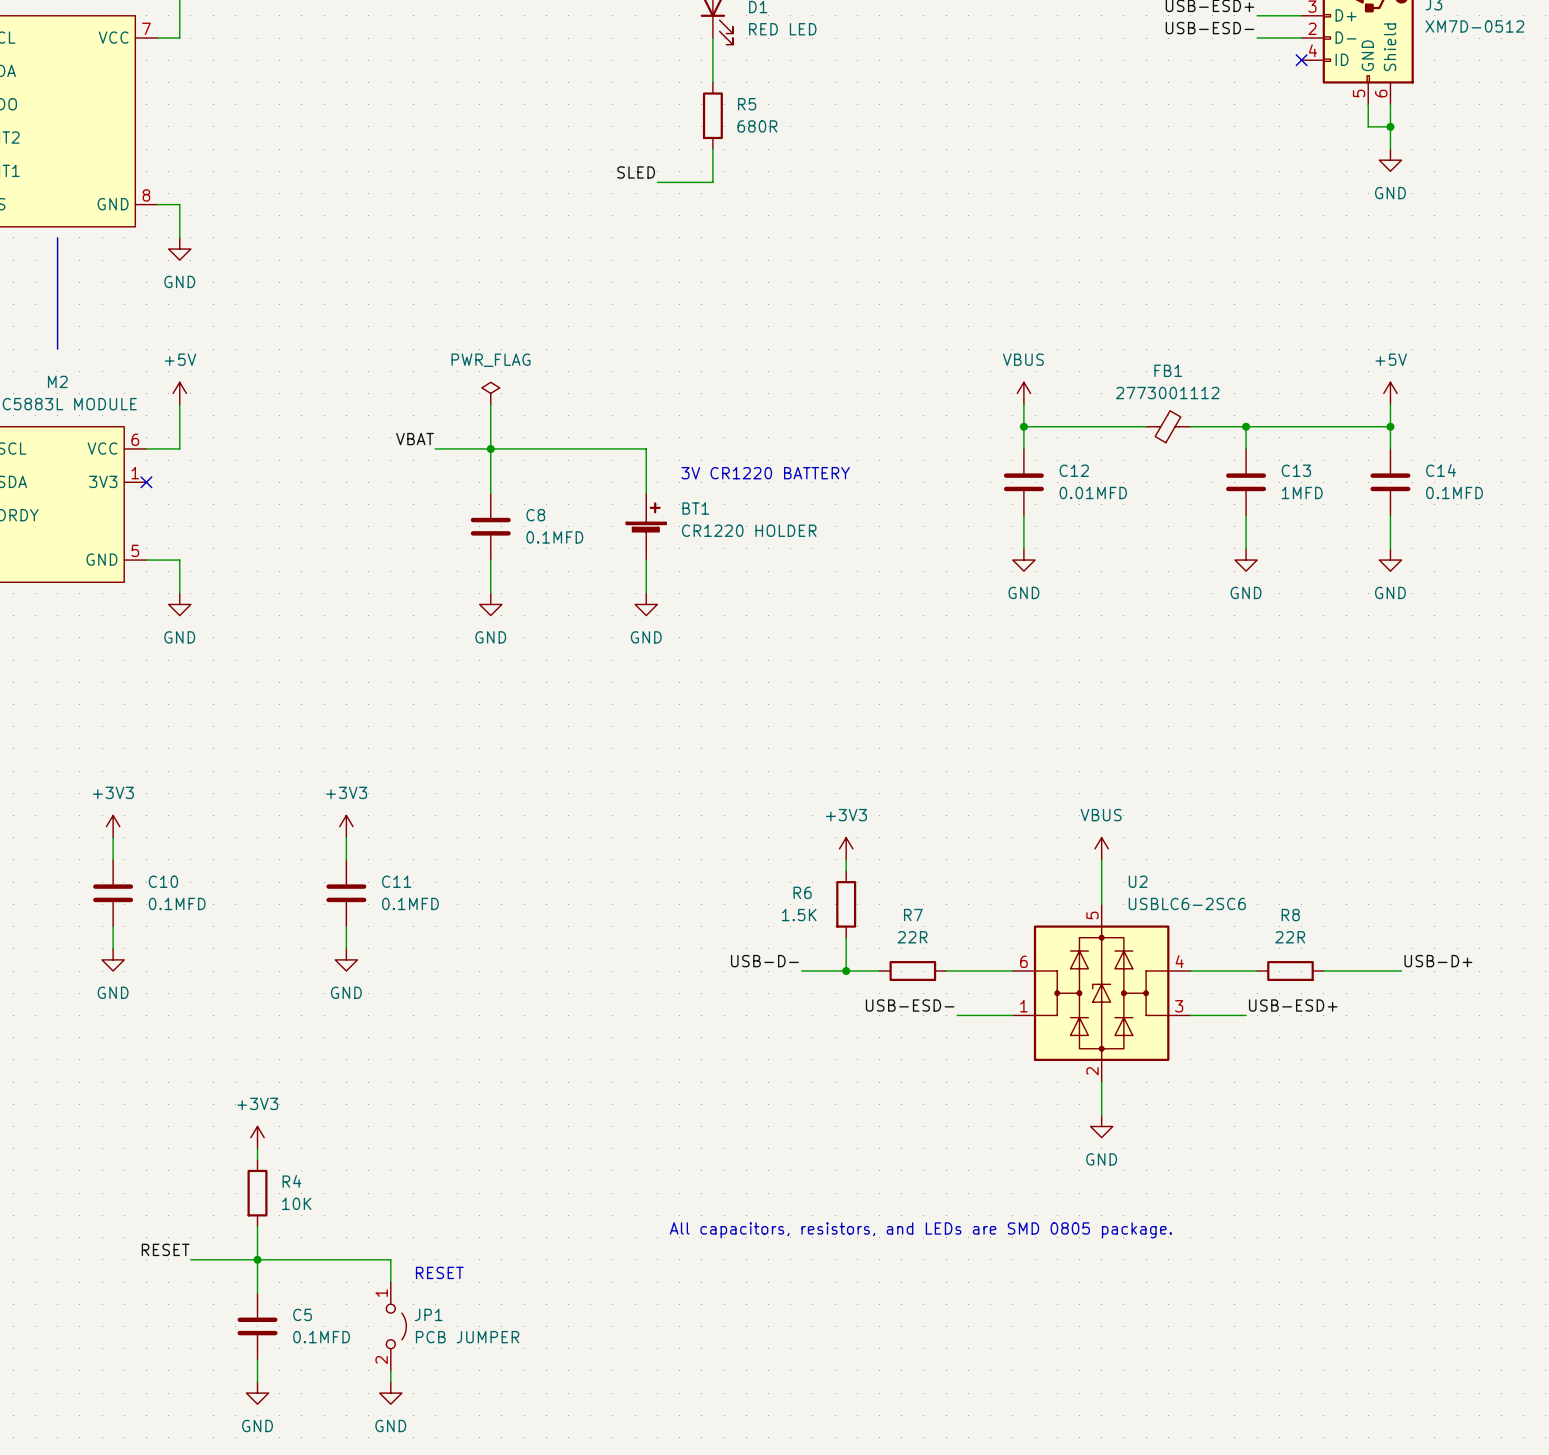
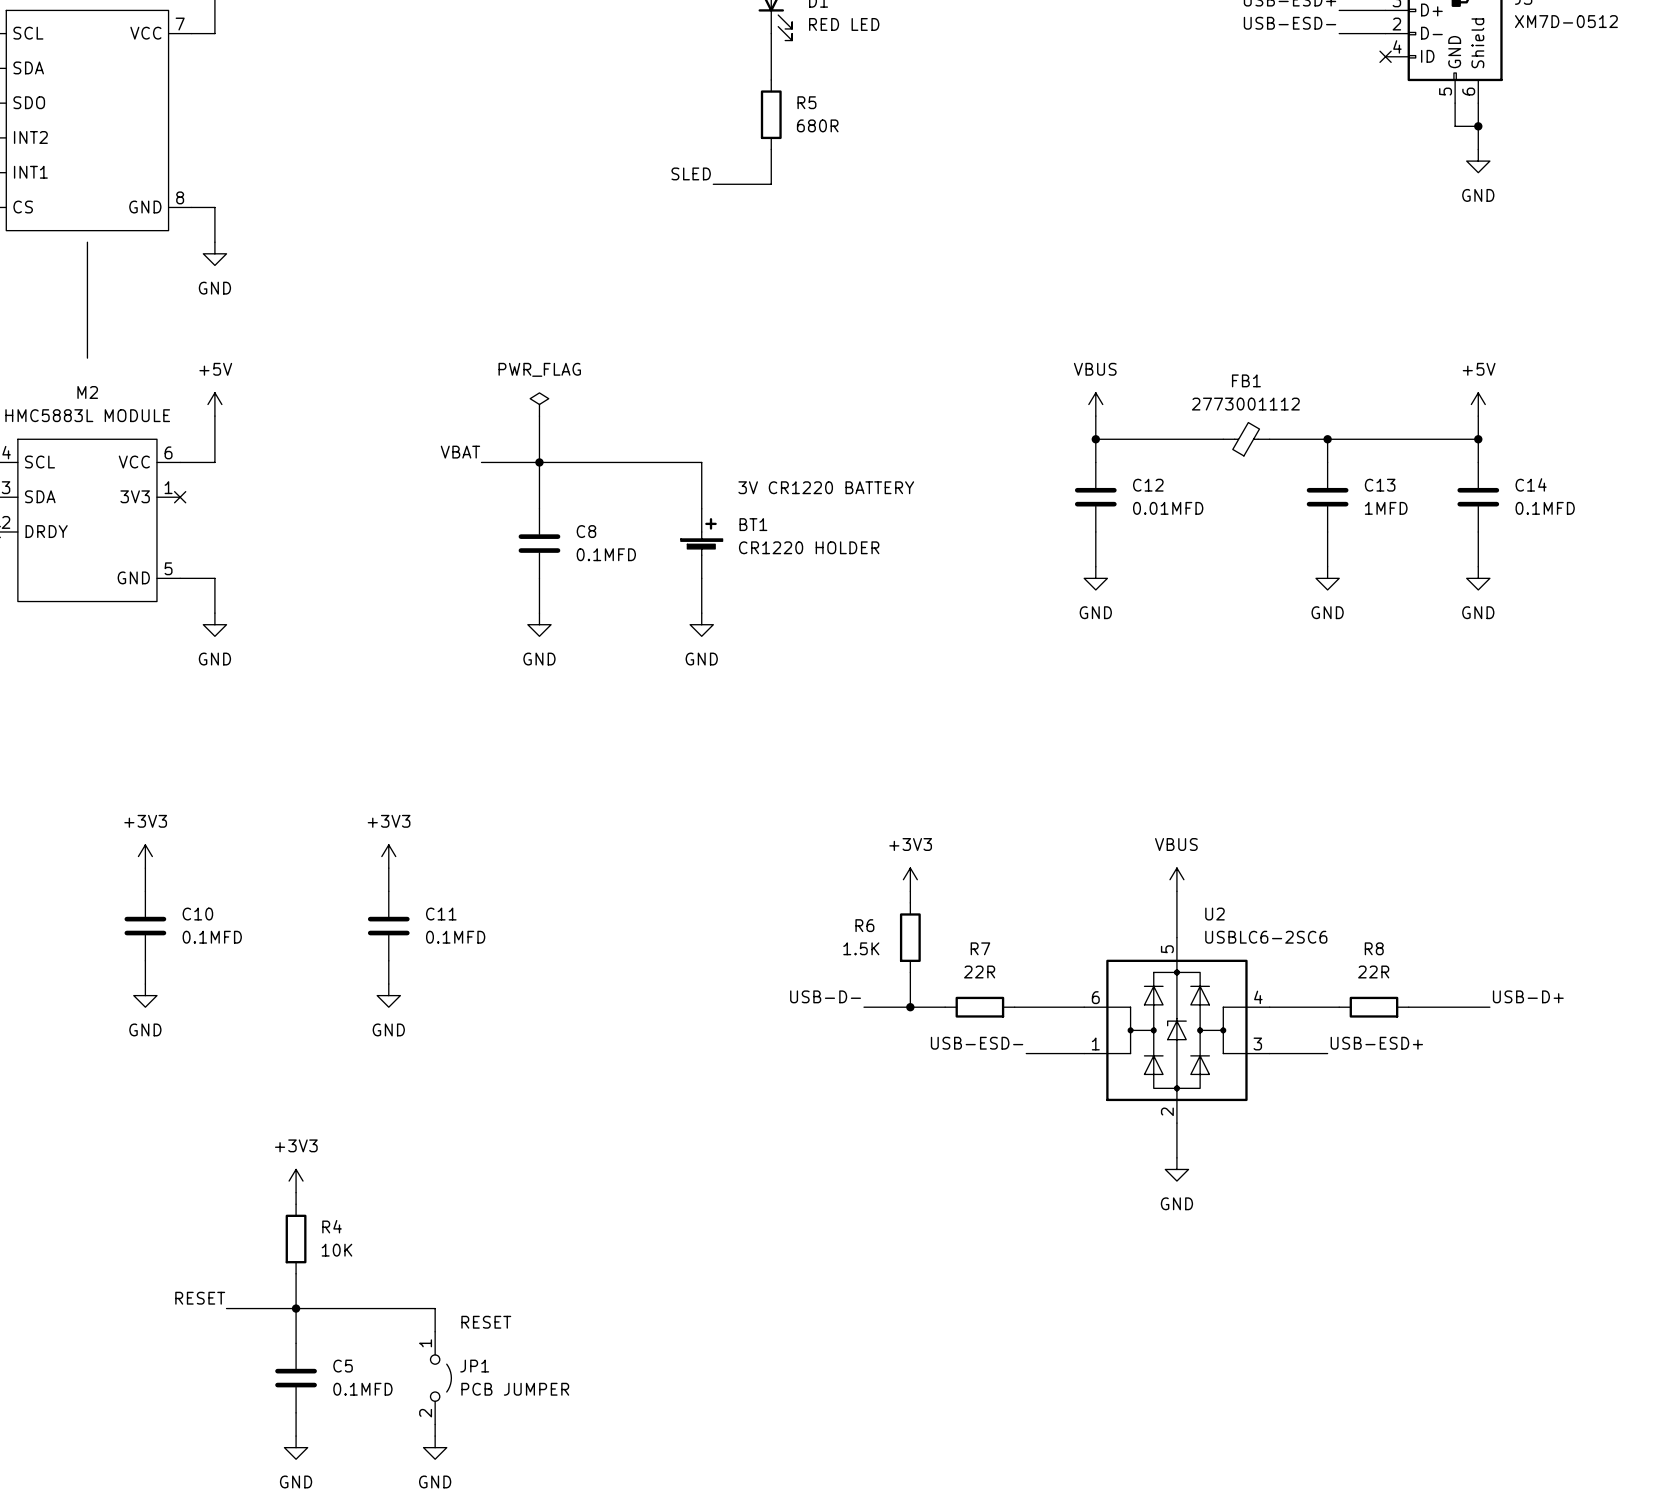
text: All capacitors, resistors, and LEDs are SMD 0805 package. (920, 1230) -> none

